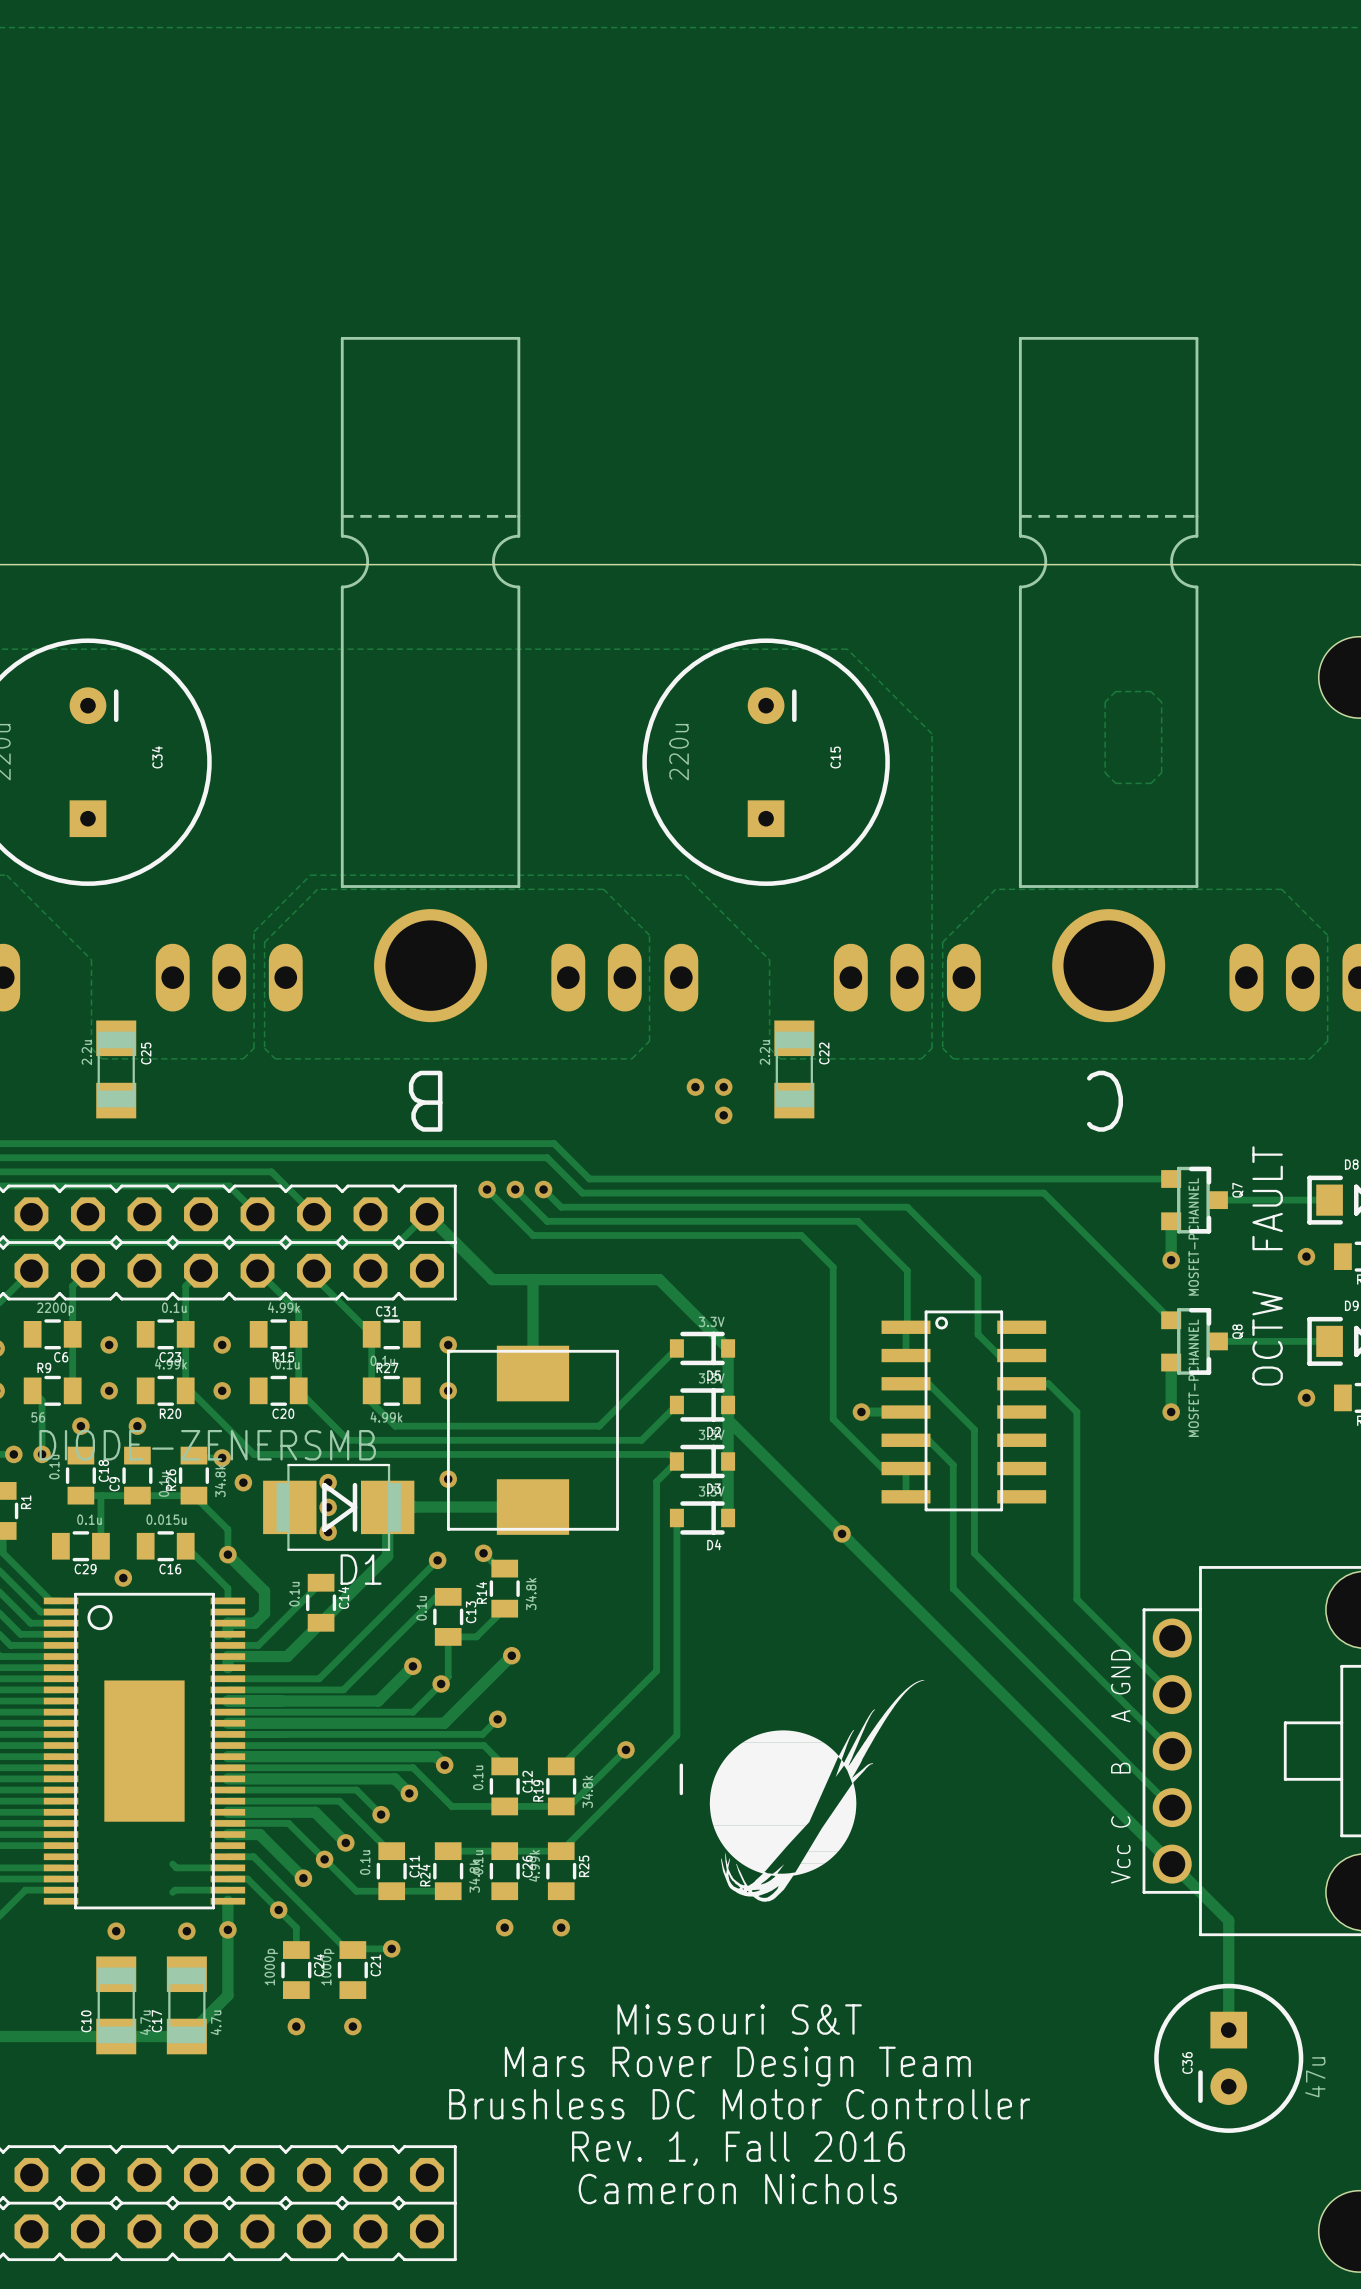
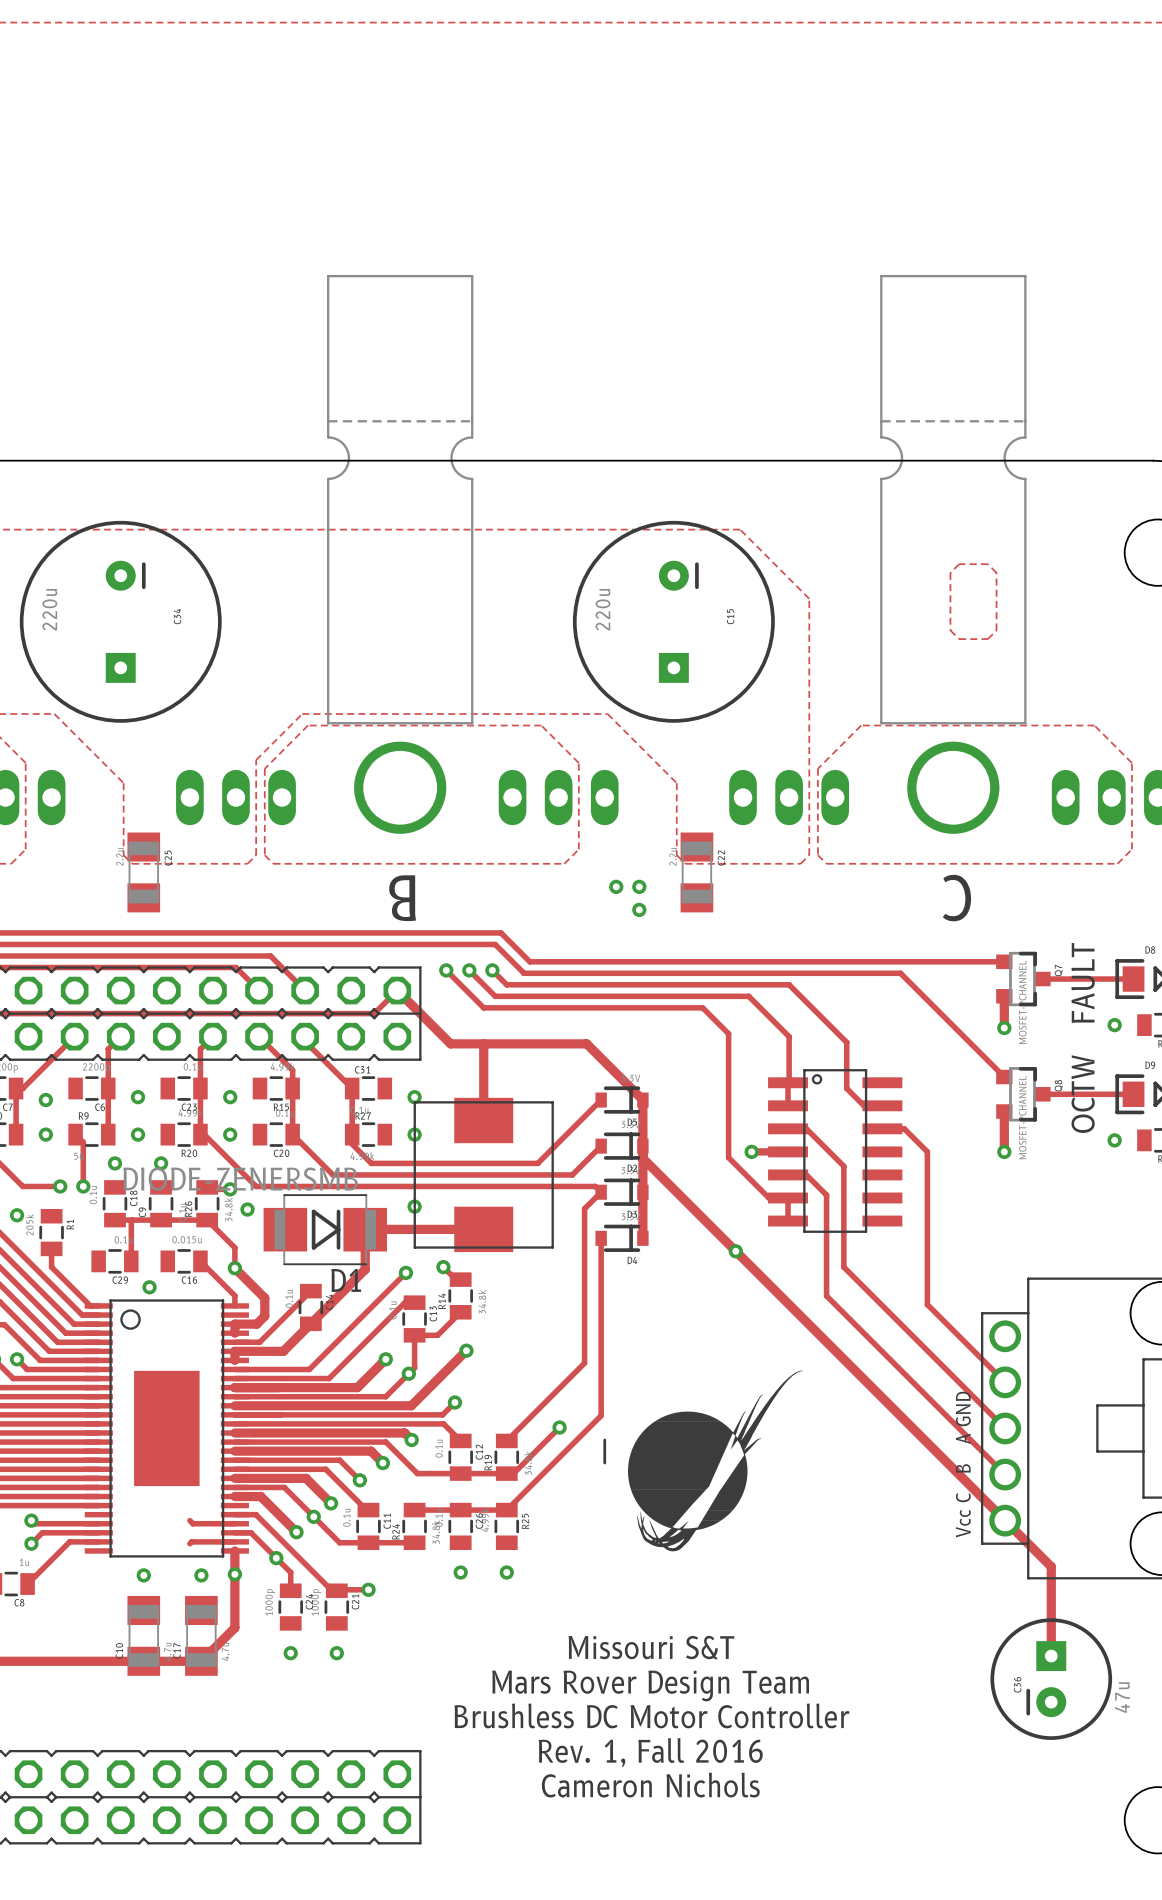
via: (328, 1482) -> none
via: (328, 1507) -> none
via: (328, 1532) -> none

